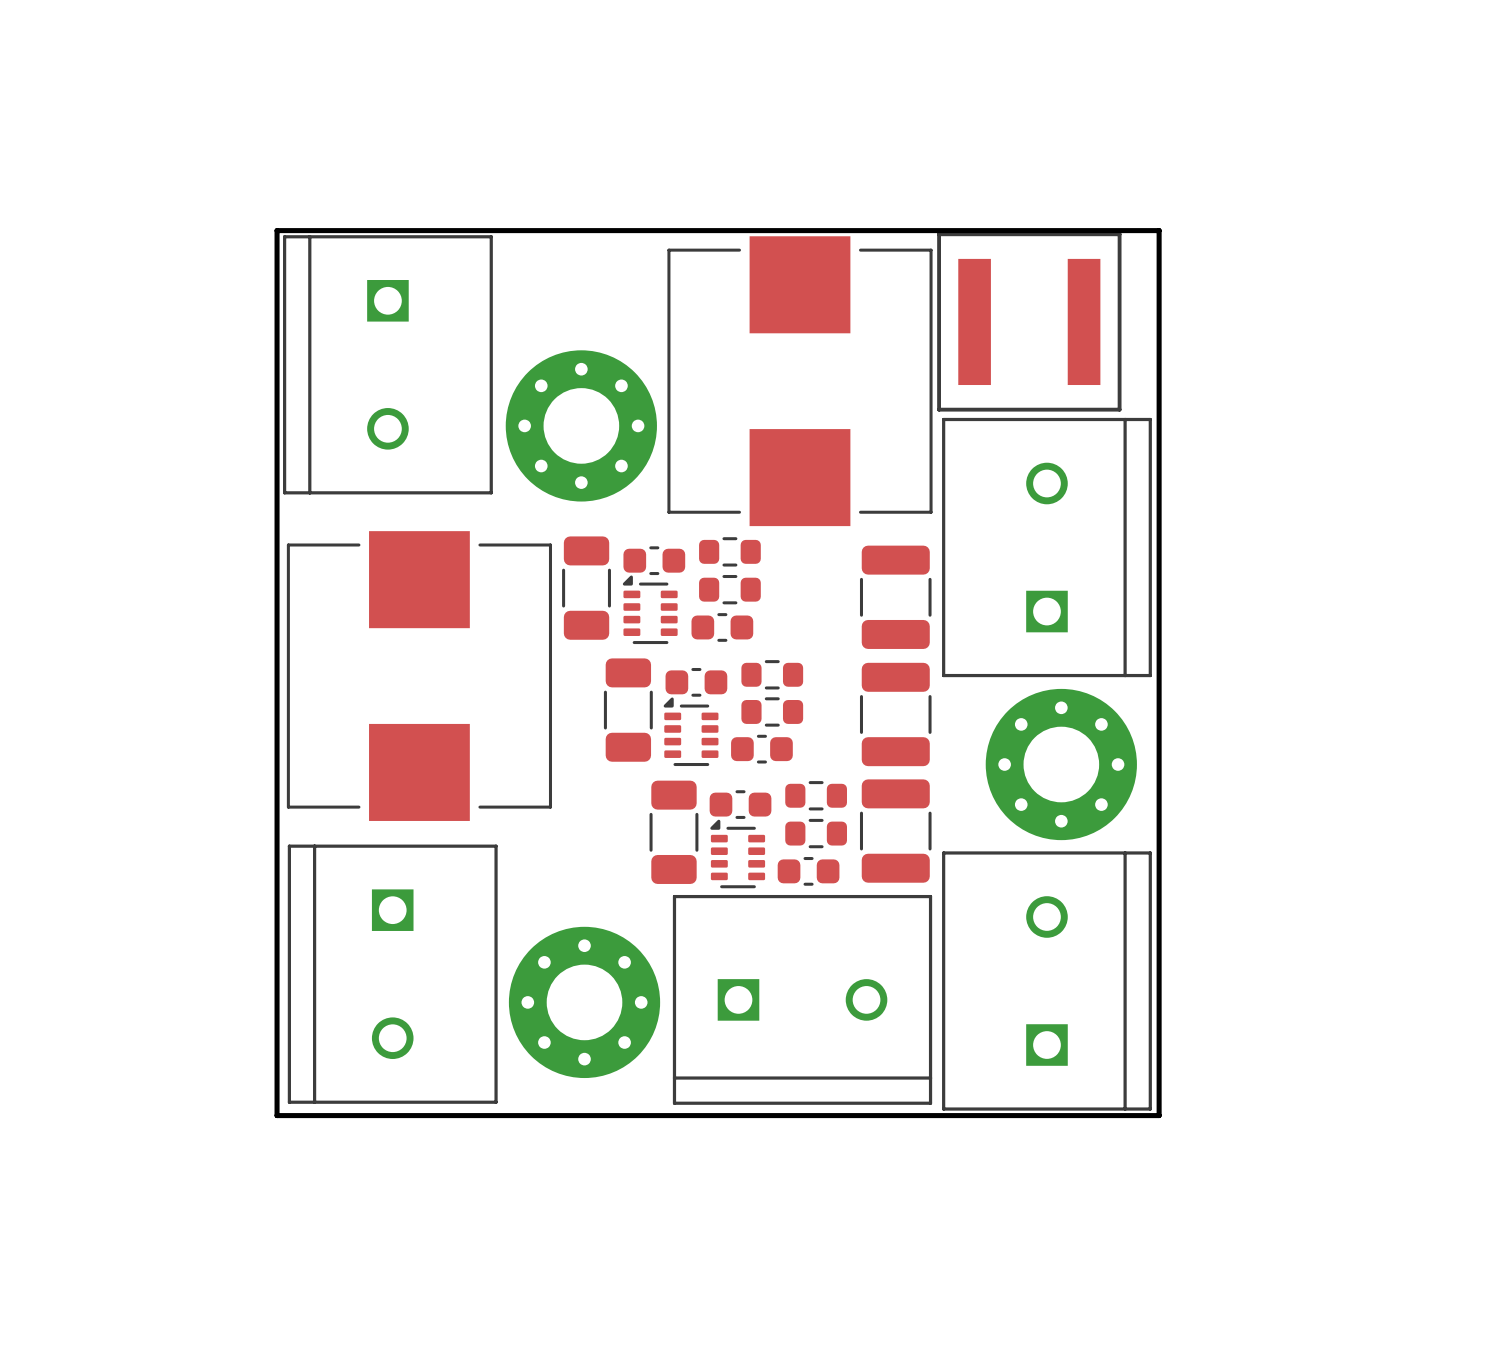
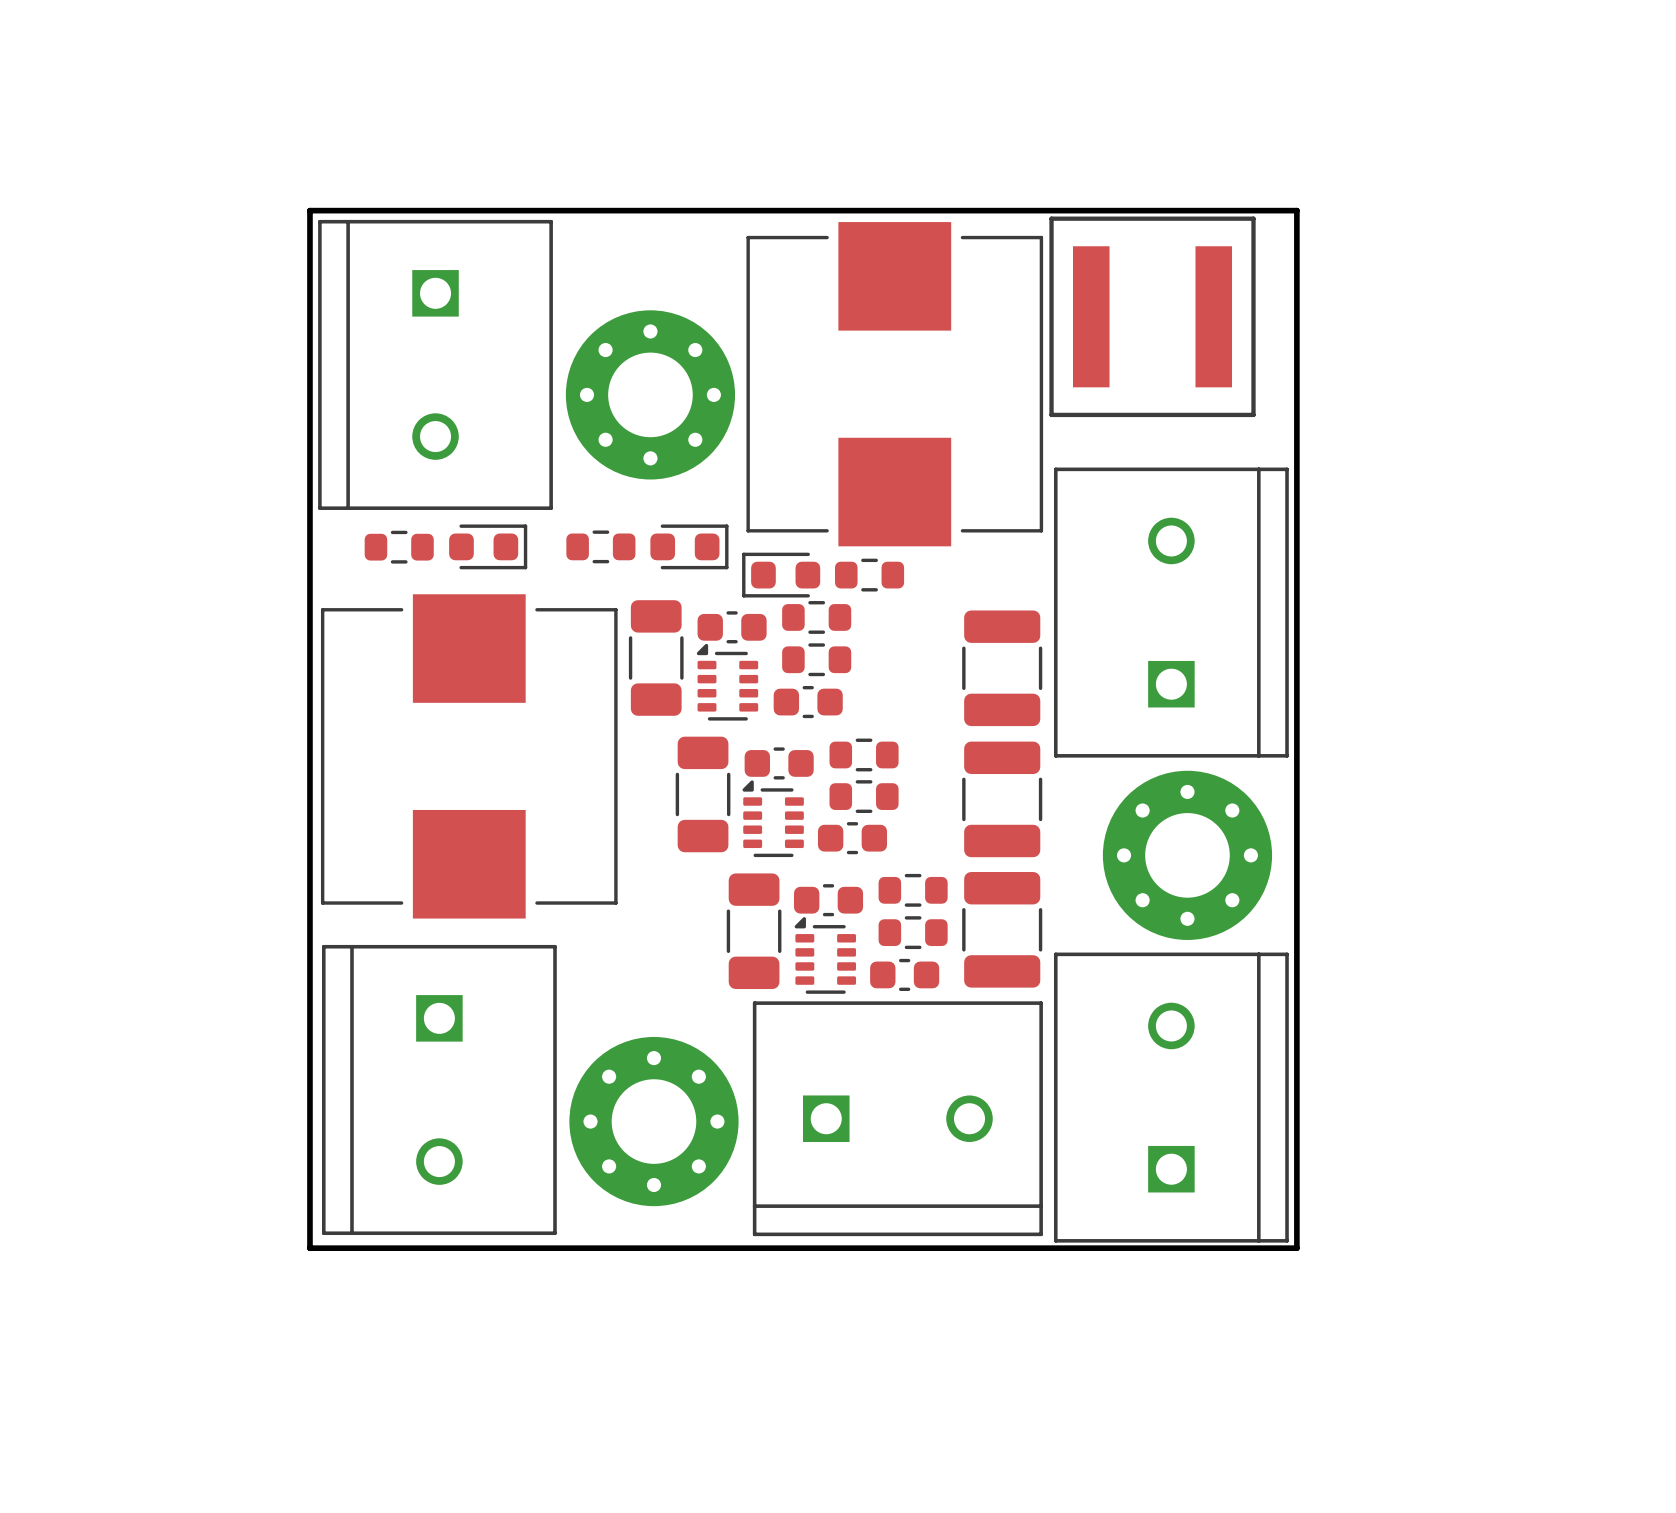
board edge: (277, 230) (1159, 230) -> (309, 258) (309, 210) (1296, 210) (1296, 258)
part position: (1029, 321) -> (1152, 316)
part position: (387, 364) -> (435, 364)
part position: (799, 381) -> (894, 384)
part position: (581, 425) -> (650, 394)
part: none -> (488, 546)
part: none -> (600, 546)
part: none -> (689, 546)
part: none -> (399, 547)
part: none -> (781, 575)
part: none -> (869, 575)

